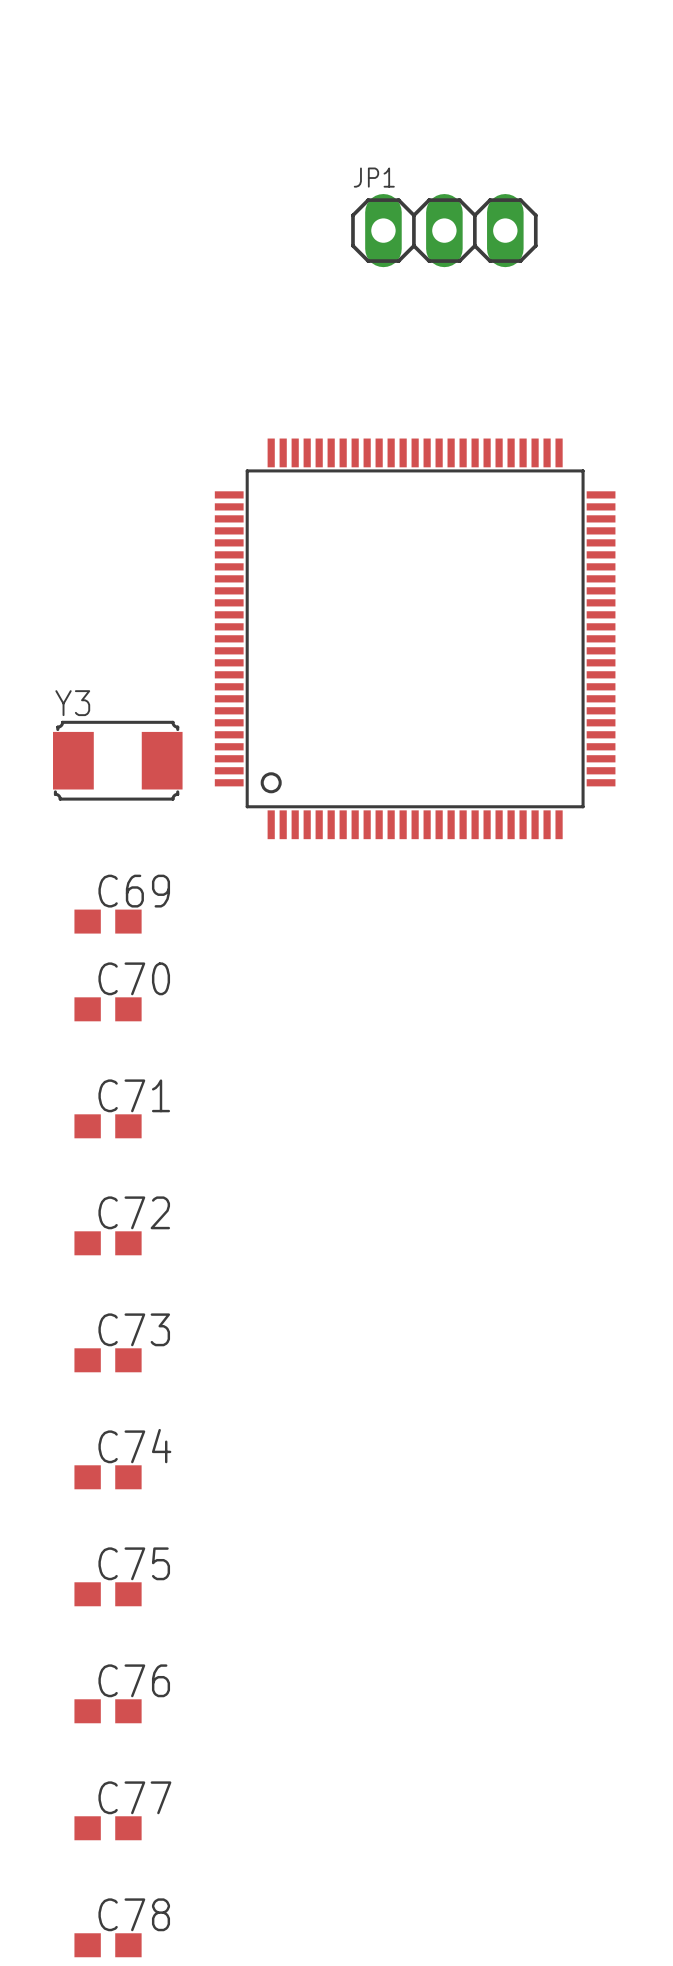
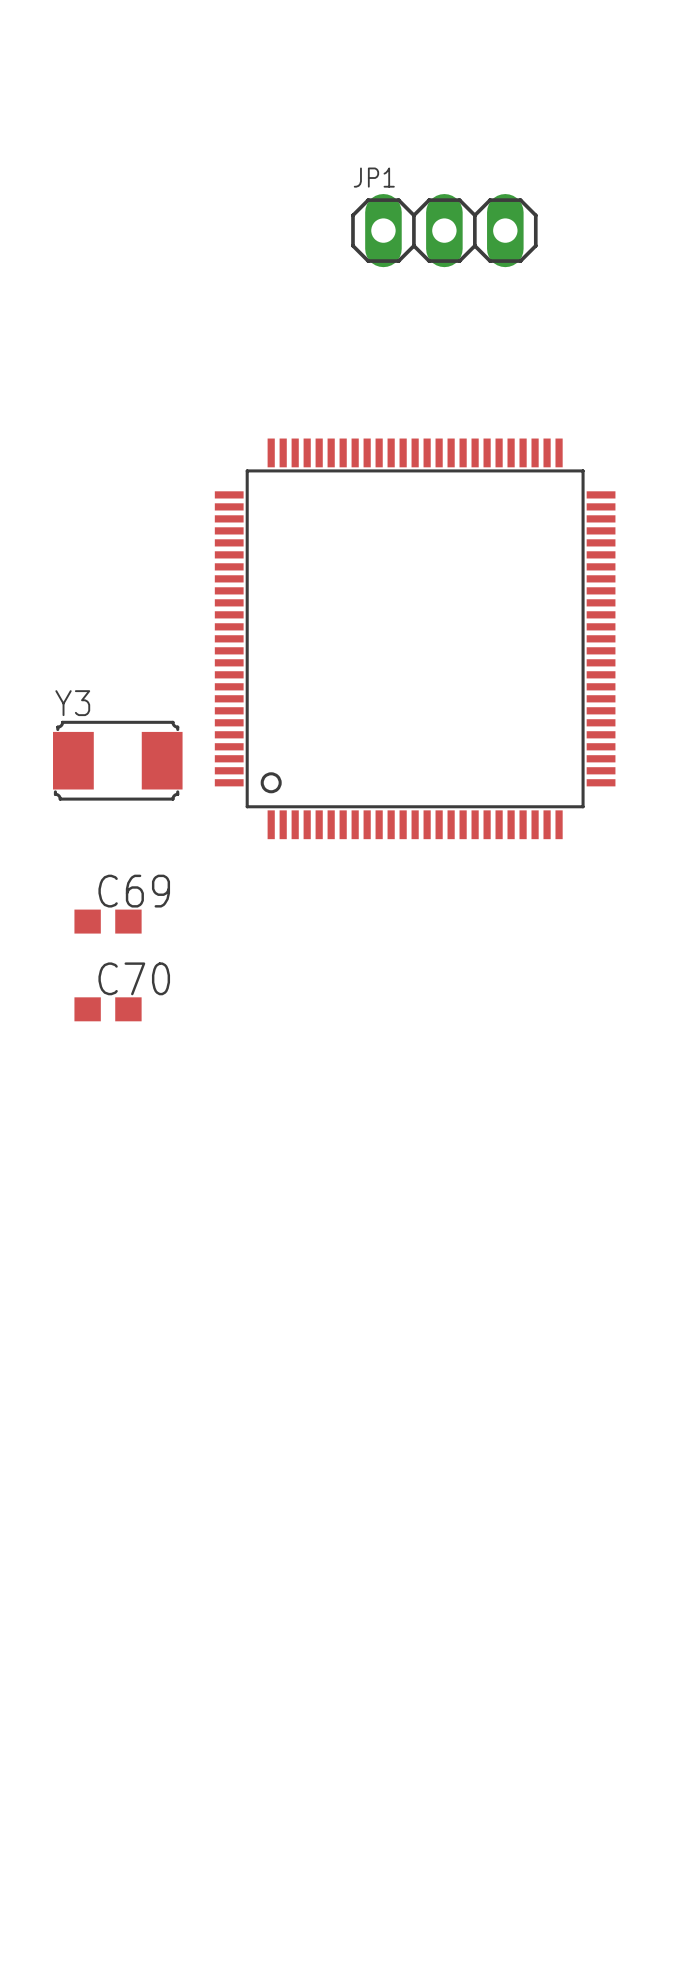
C71: (108, 1126) -> none
C72: (108, 1243) -> none
C73: (108, 1360) -> none
C74: (108, 1477) -> none
C75: (108, 1594) -> none
C76: (108, 1711) -> none
C77: (108, 1828) -> none
C78: (108, 1945) -> none

